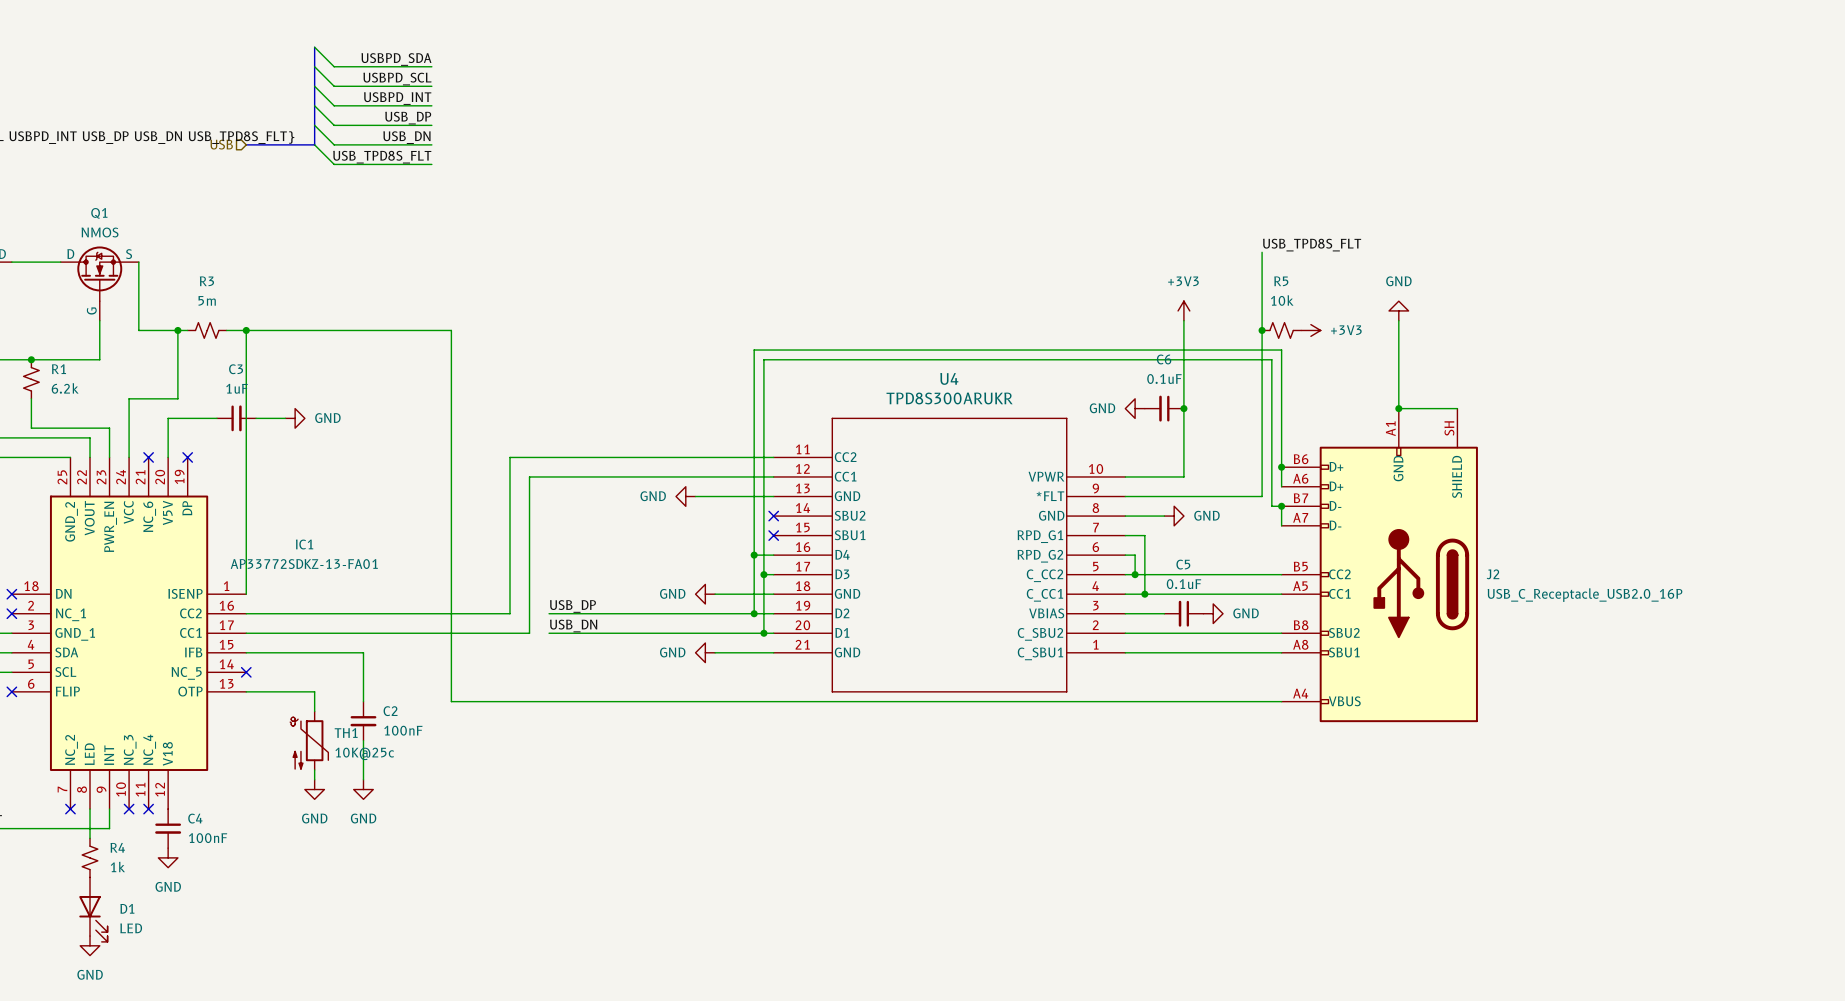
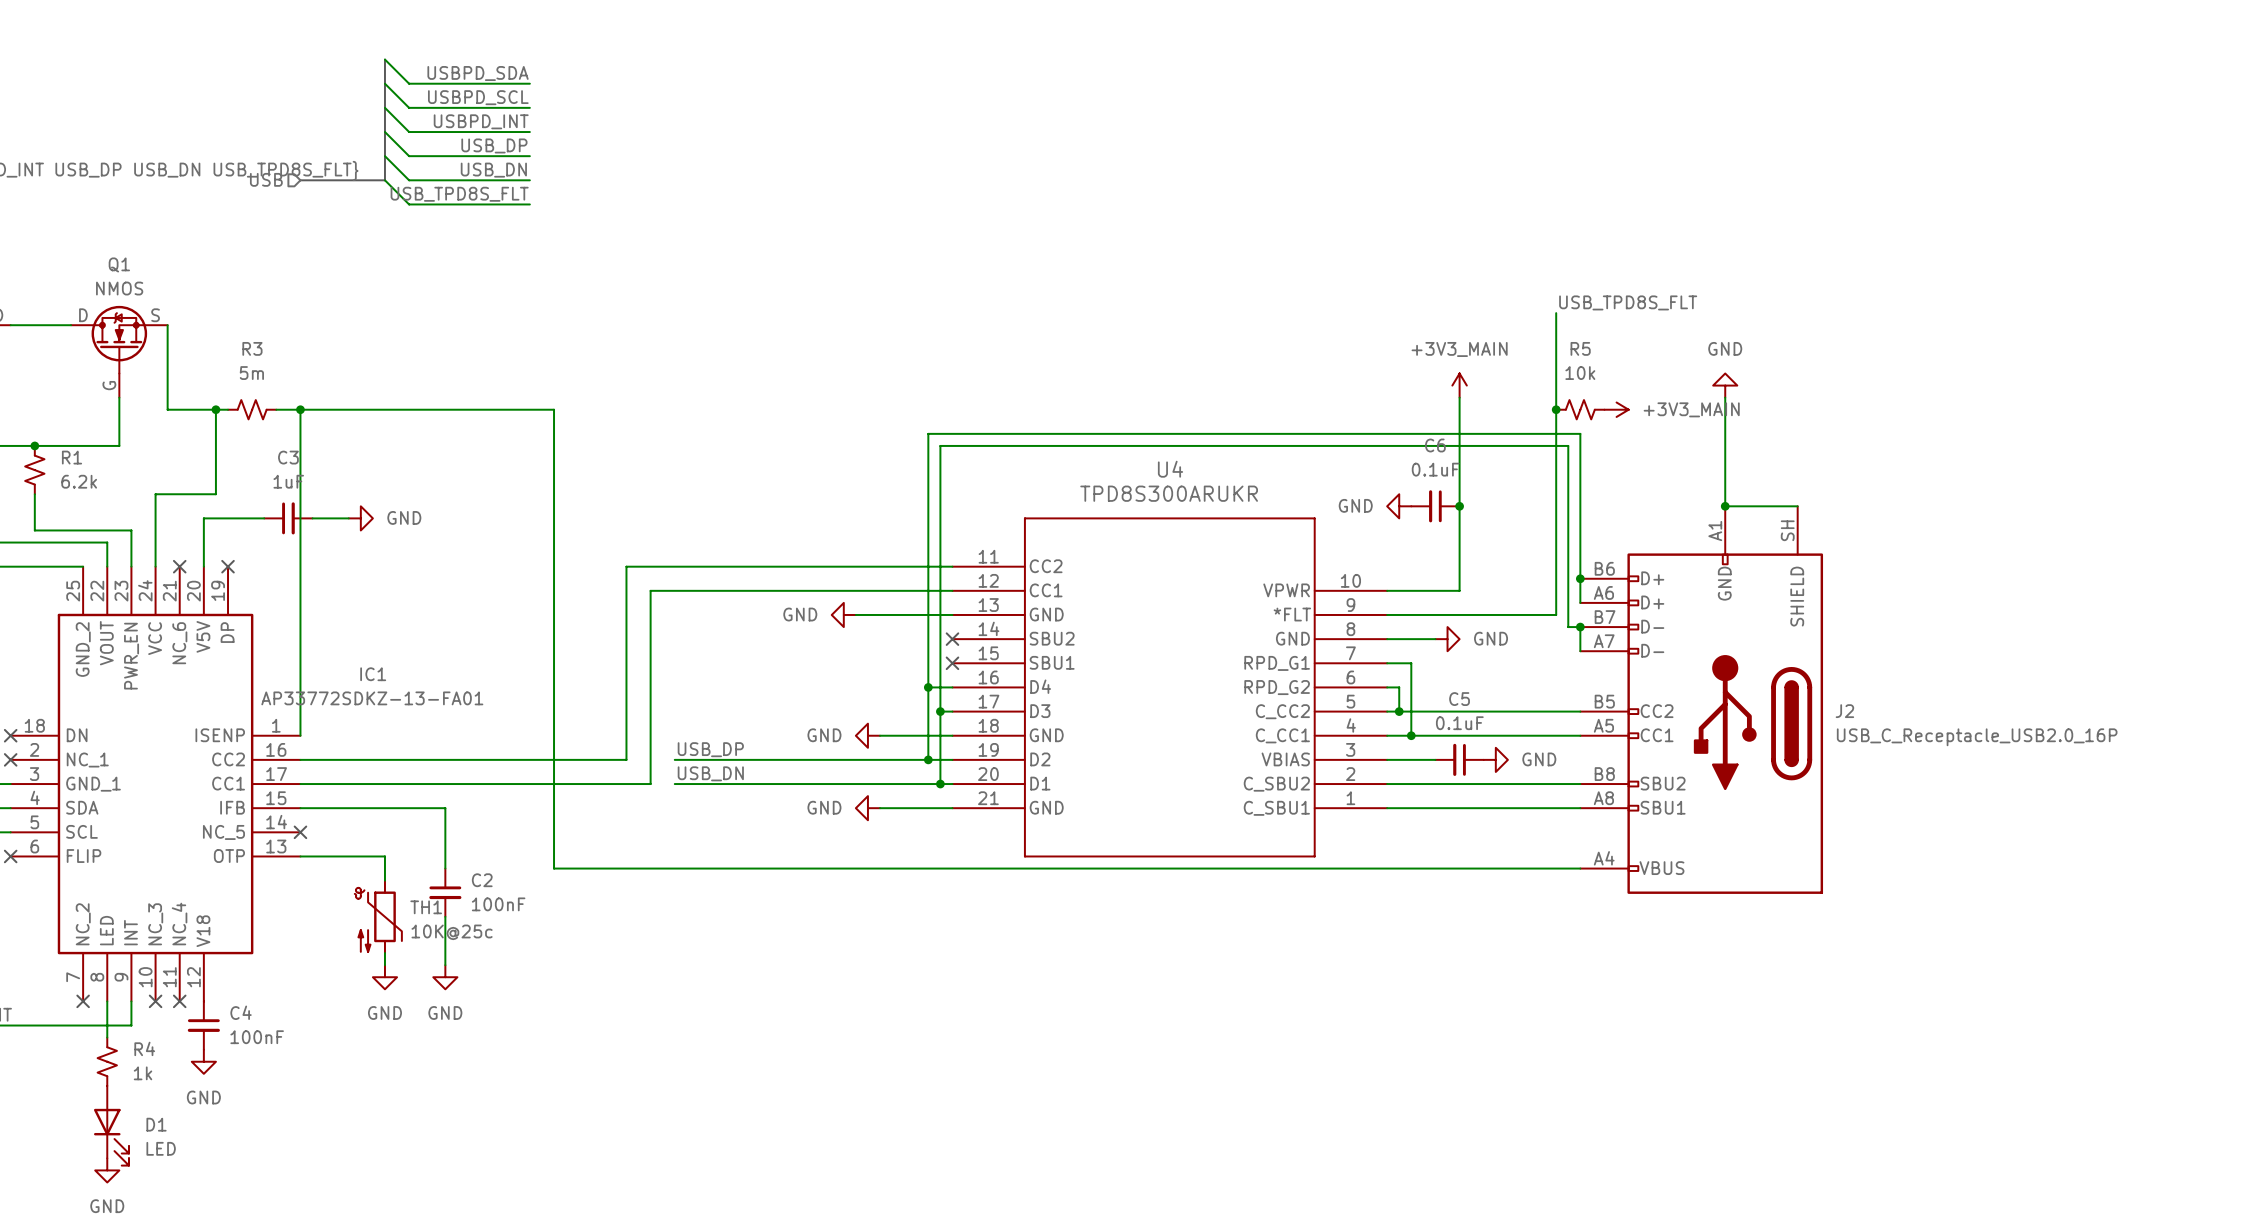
power symbol: +3V3 (1183, 310) -> +3V3_MAIN (1459, 385)
power symbol: +3V3 (1310, 330) -> +3V3_MAIN (1616, 409)

